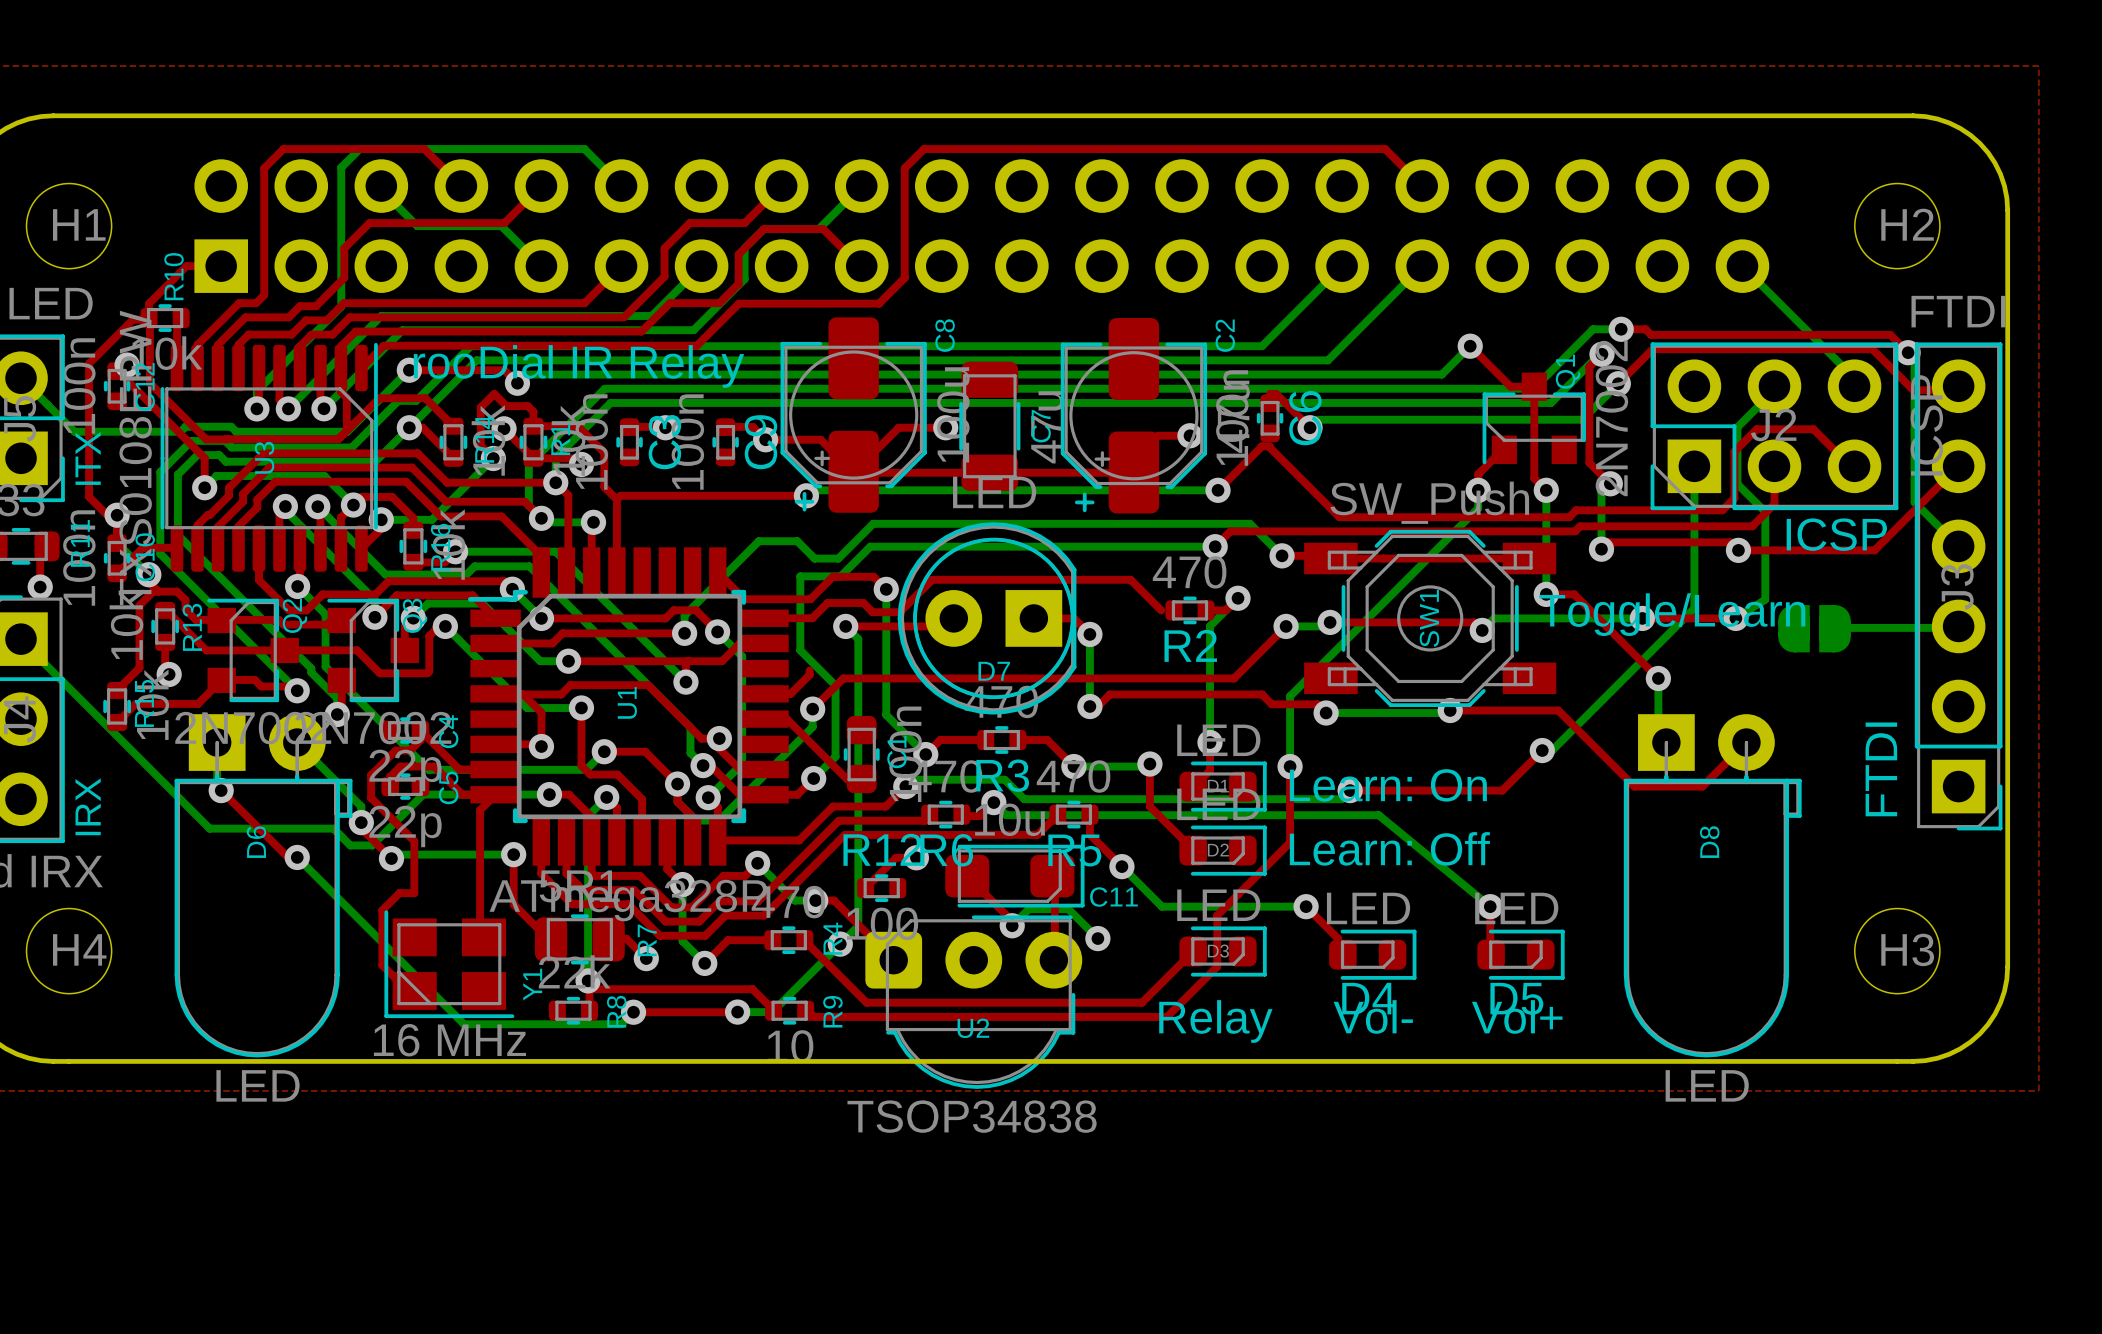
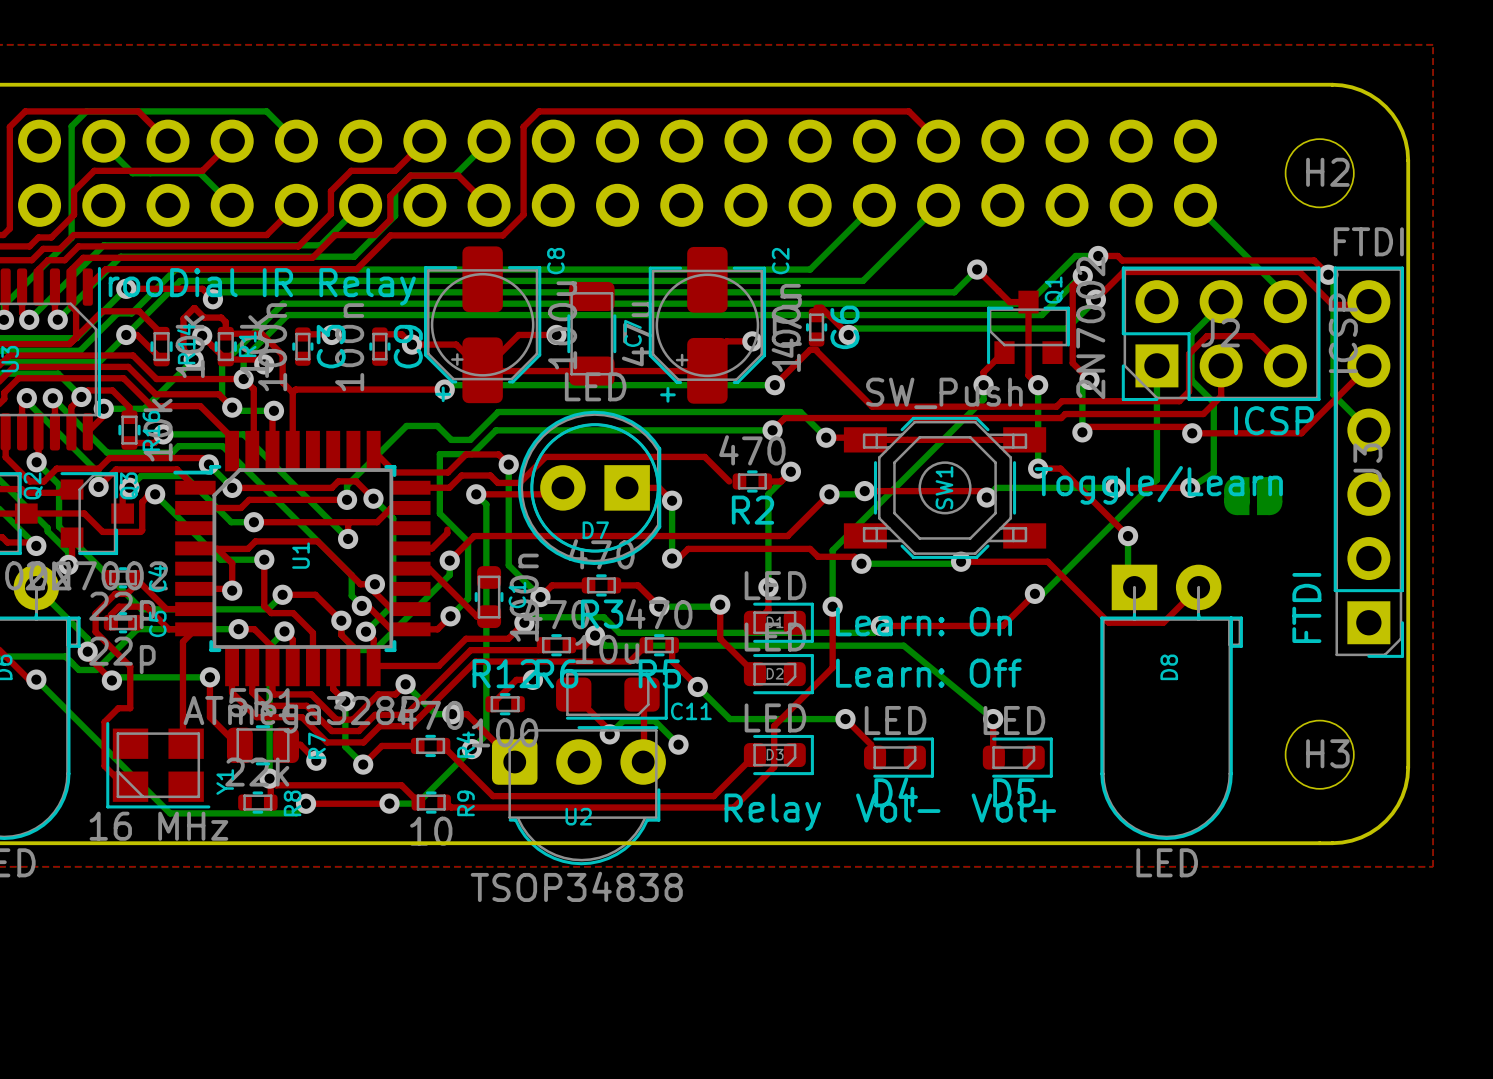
bottom track: (1838, 627) (1957, 627) -> none

